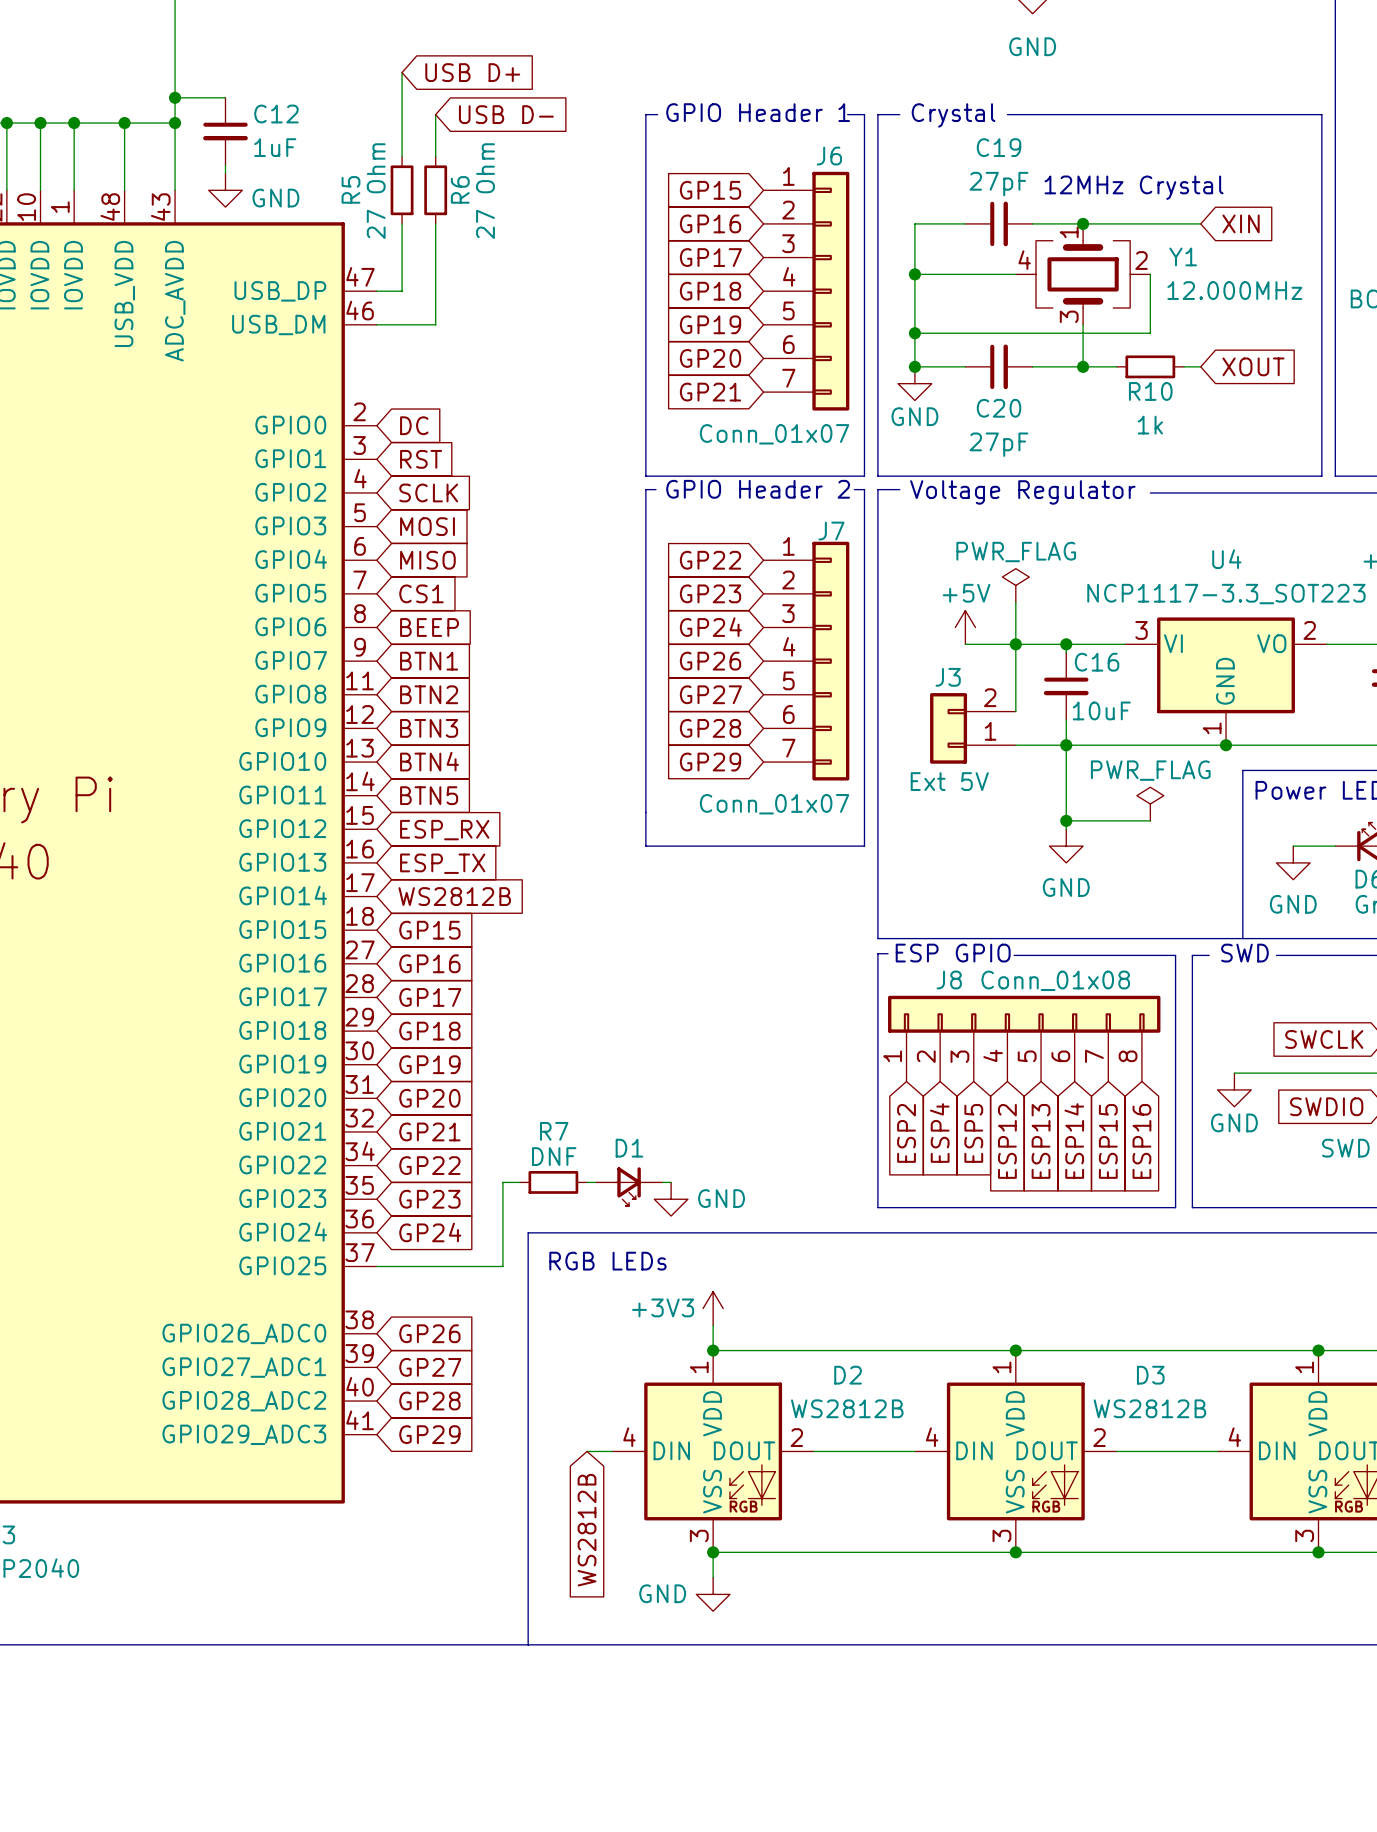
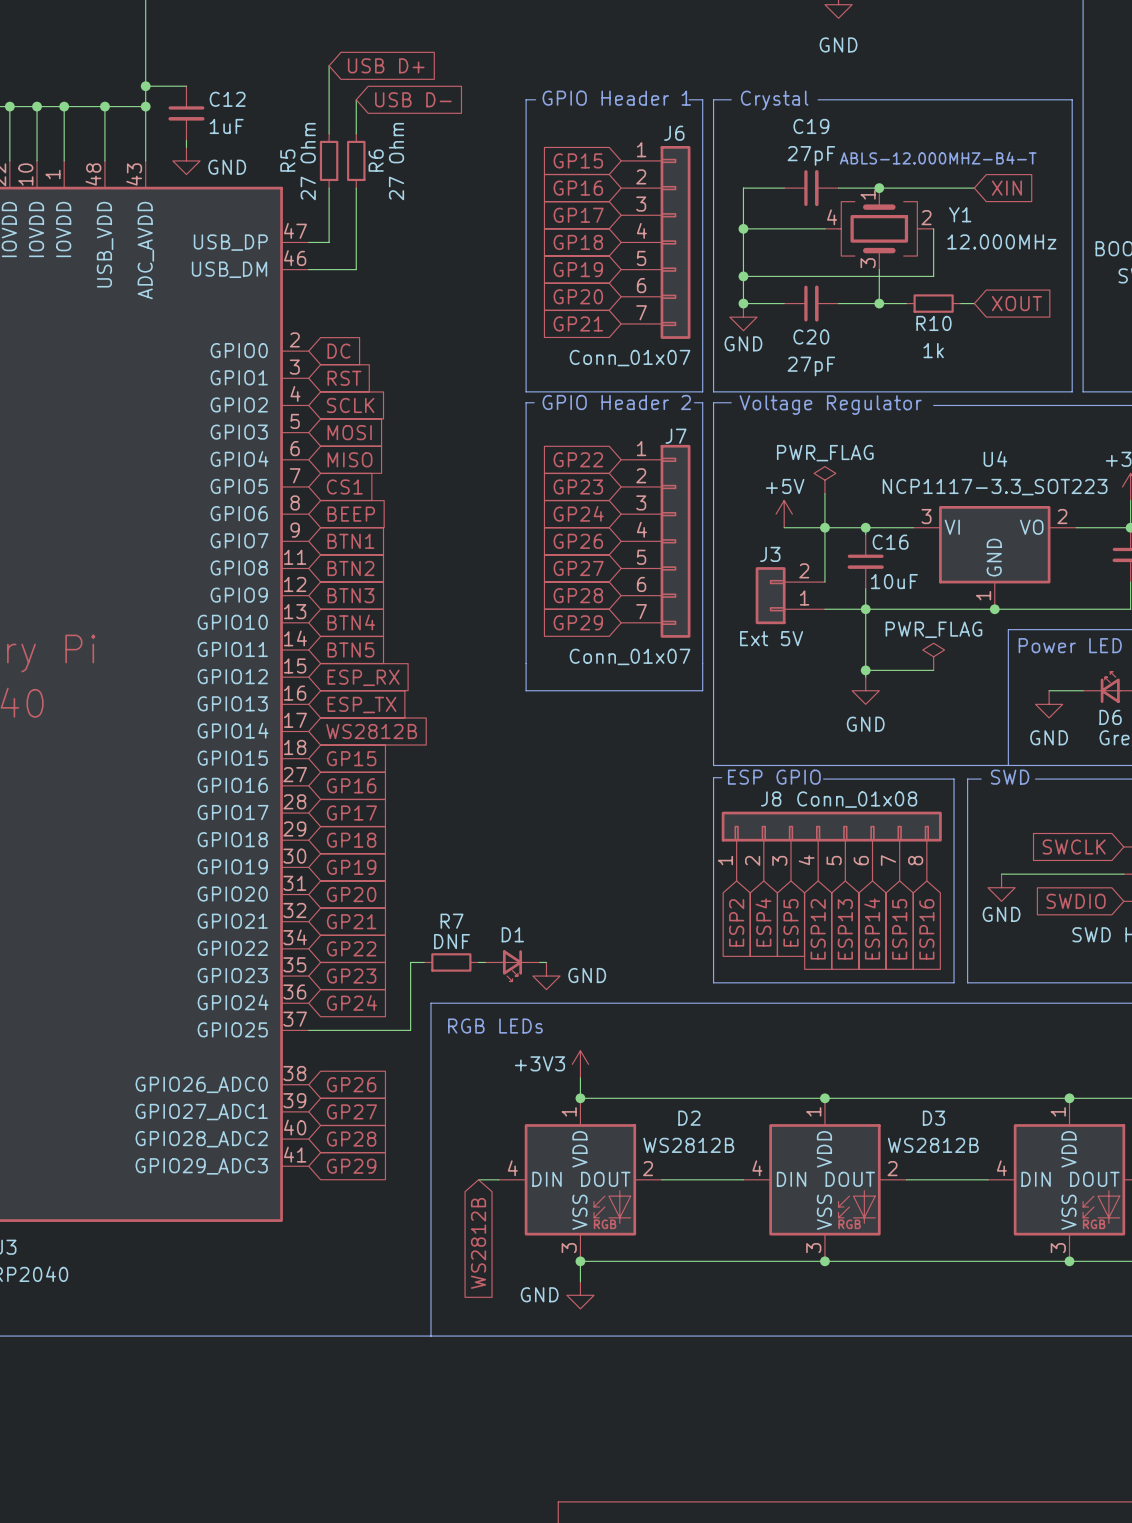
text: 12MHz Crystal (1134, 187) -> ABLS-12.000MHZ-B4-T (938, 158)

